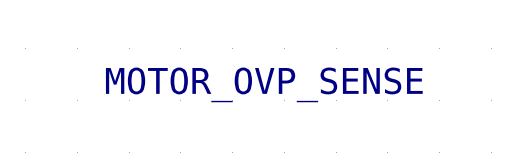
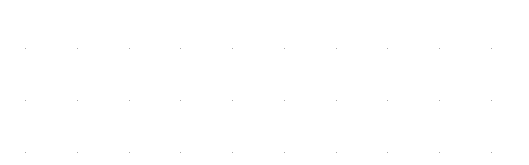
text: MOTOR_OVP_SENSE (264, 84) -> none

